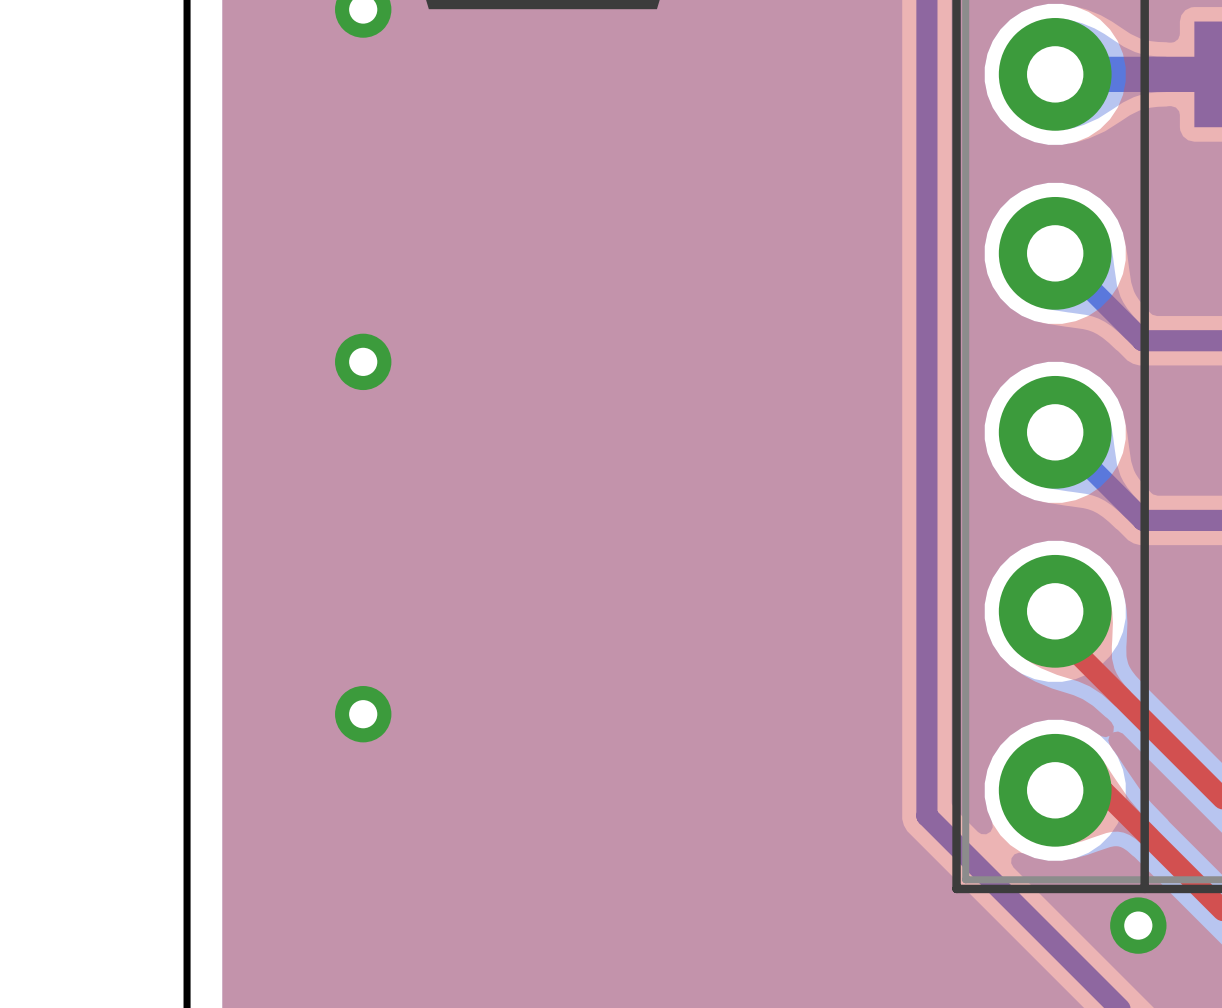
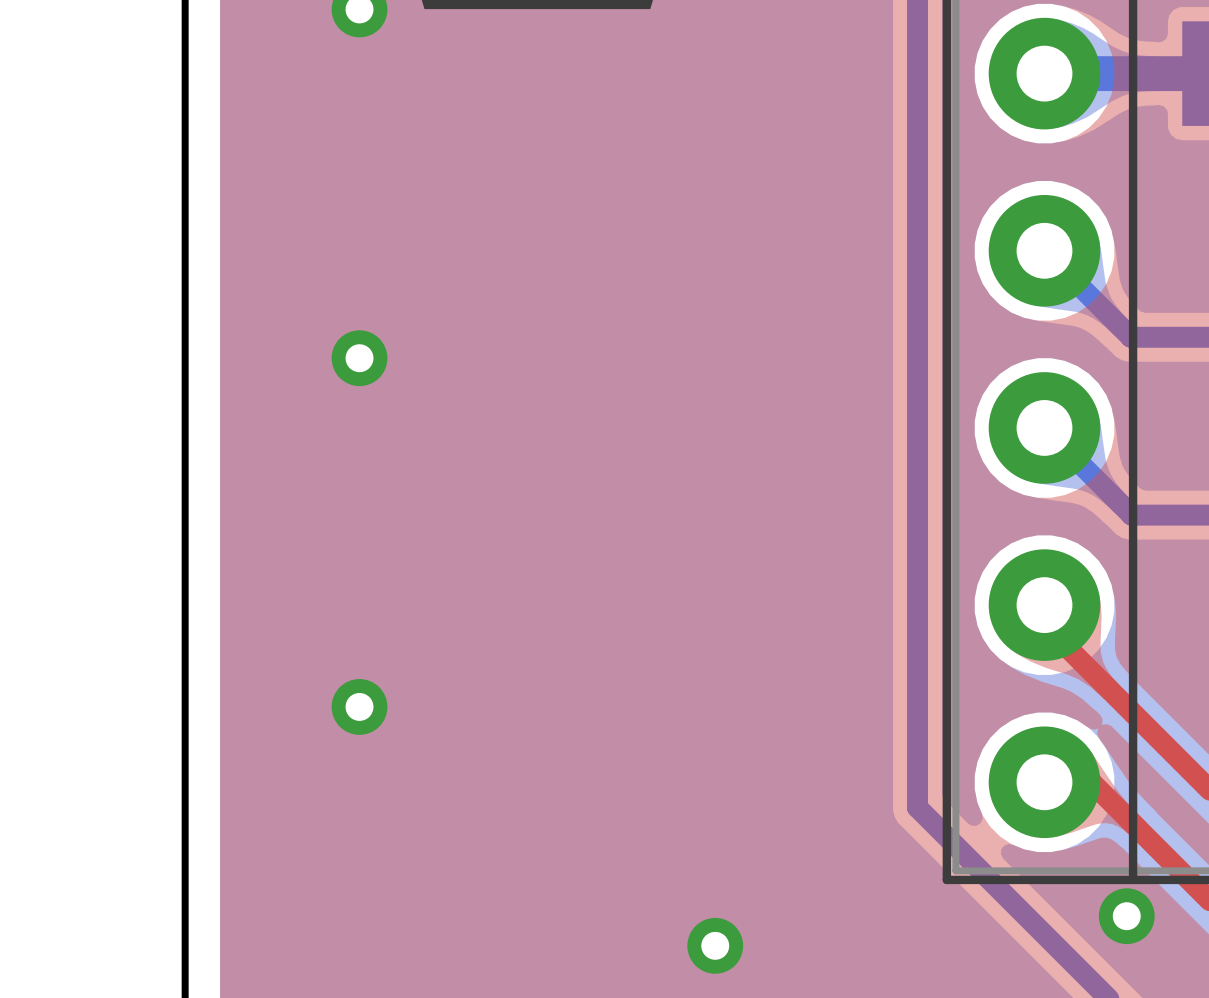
via: none -> (715, 945)

